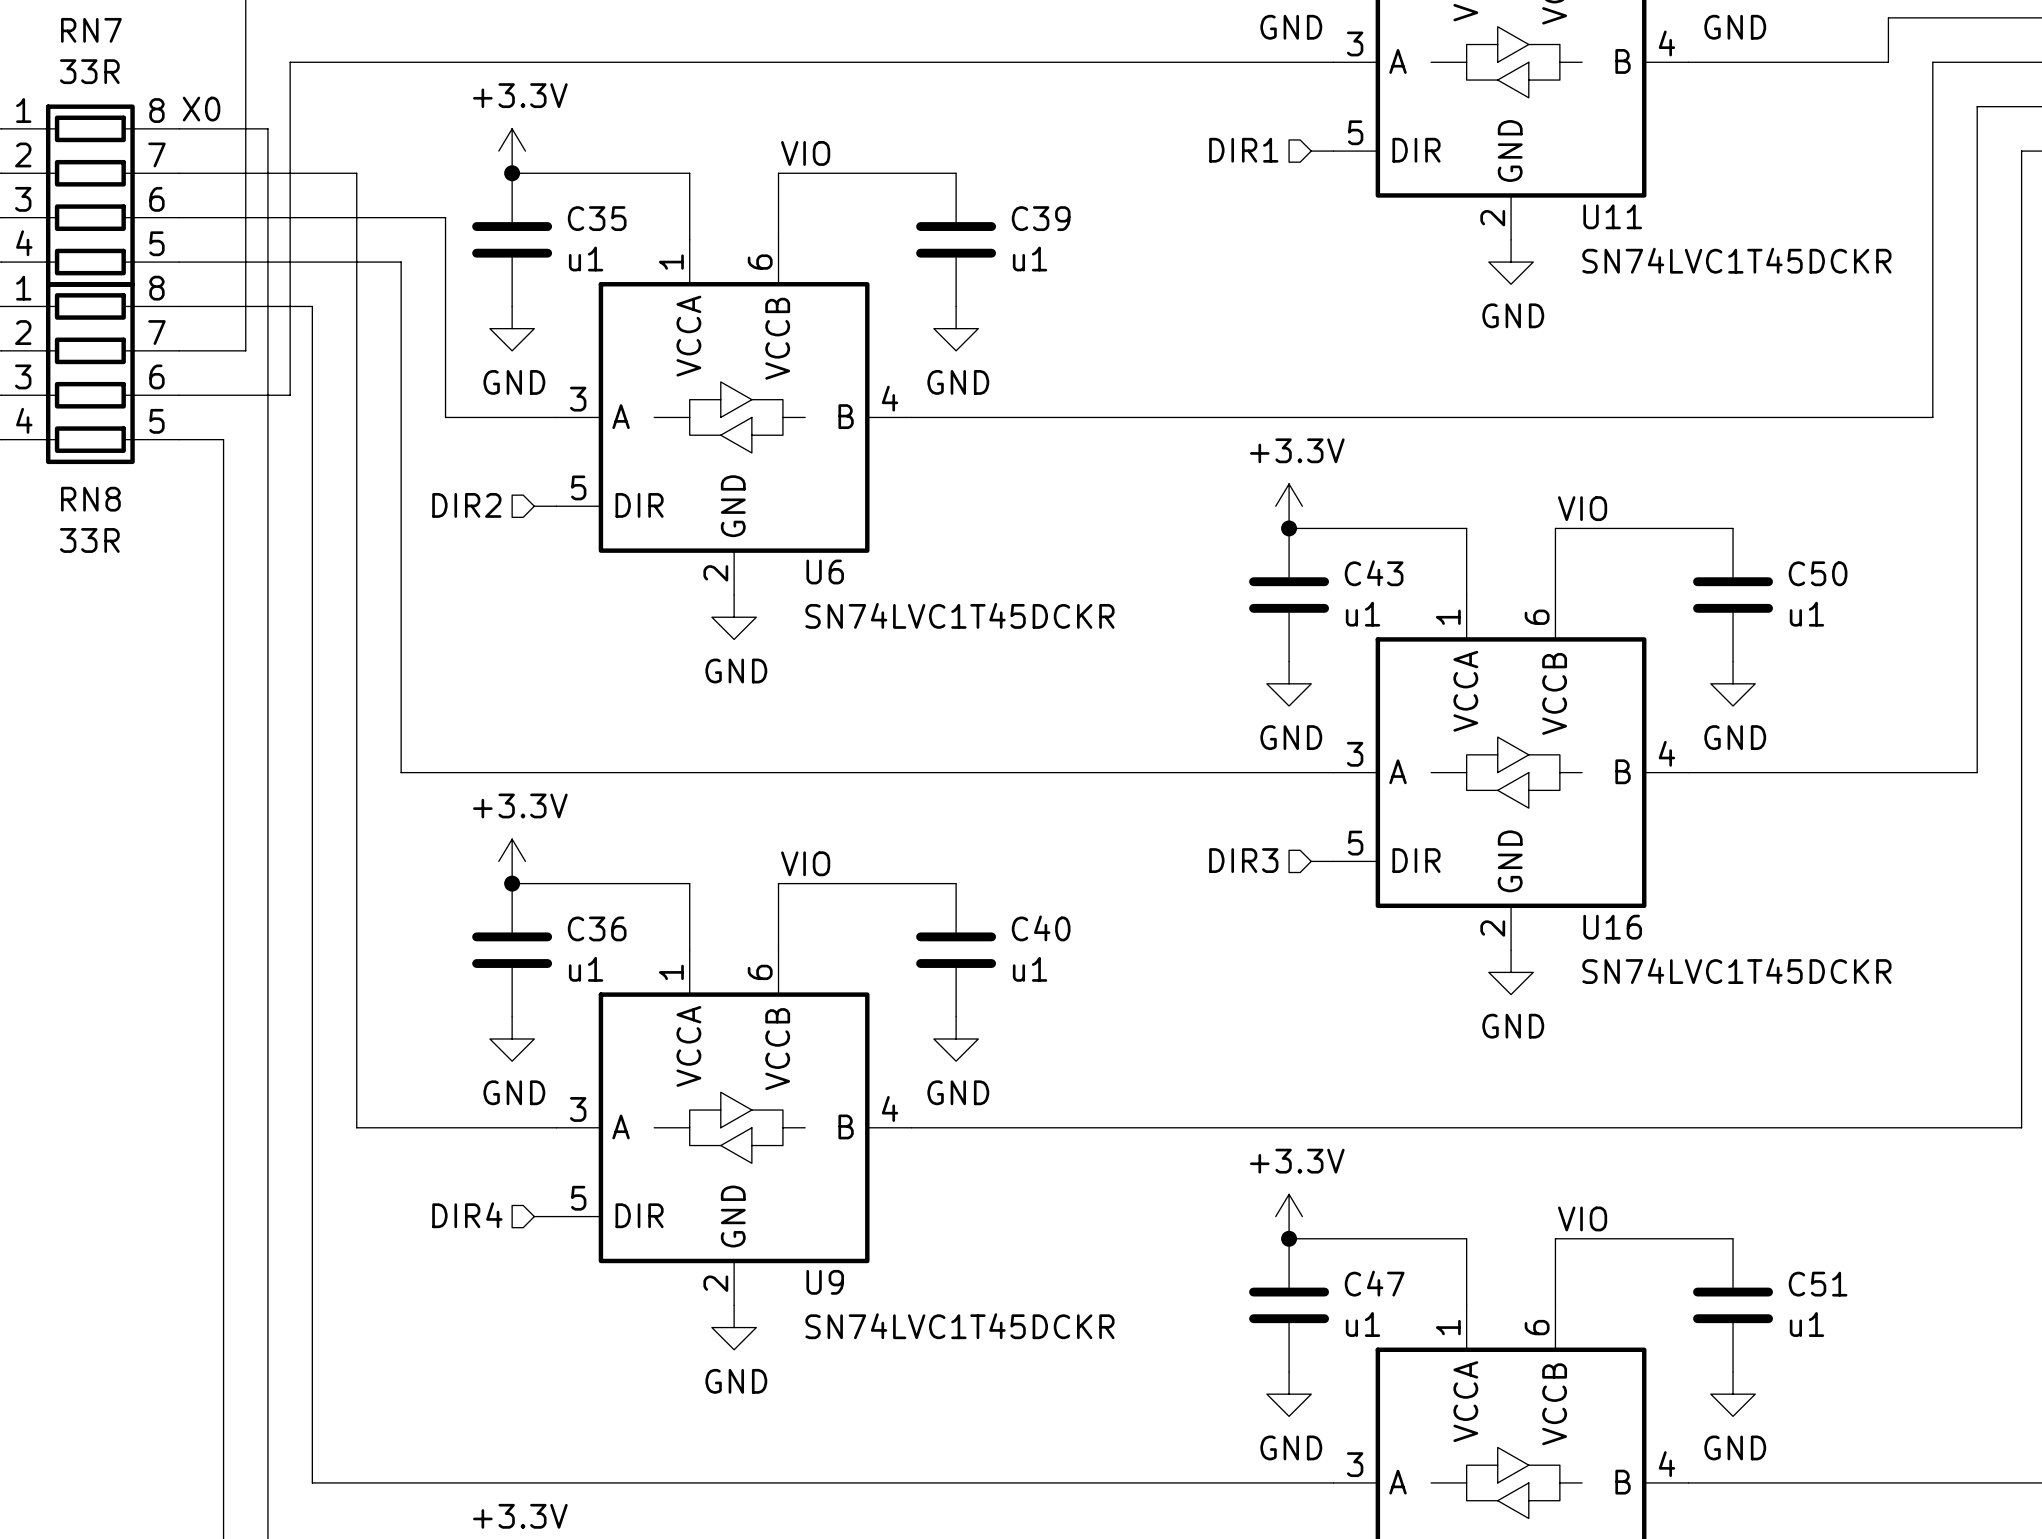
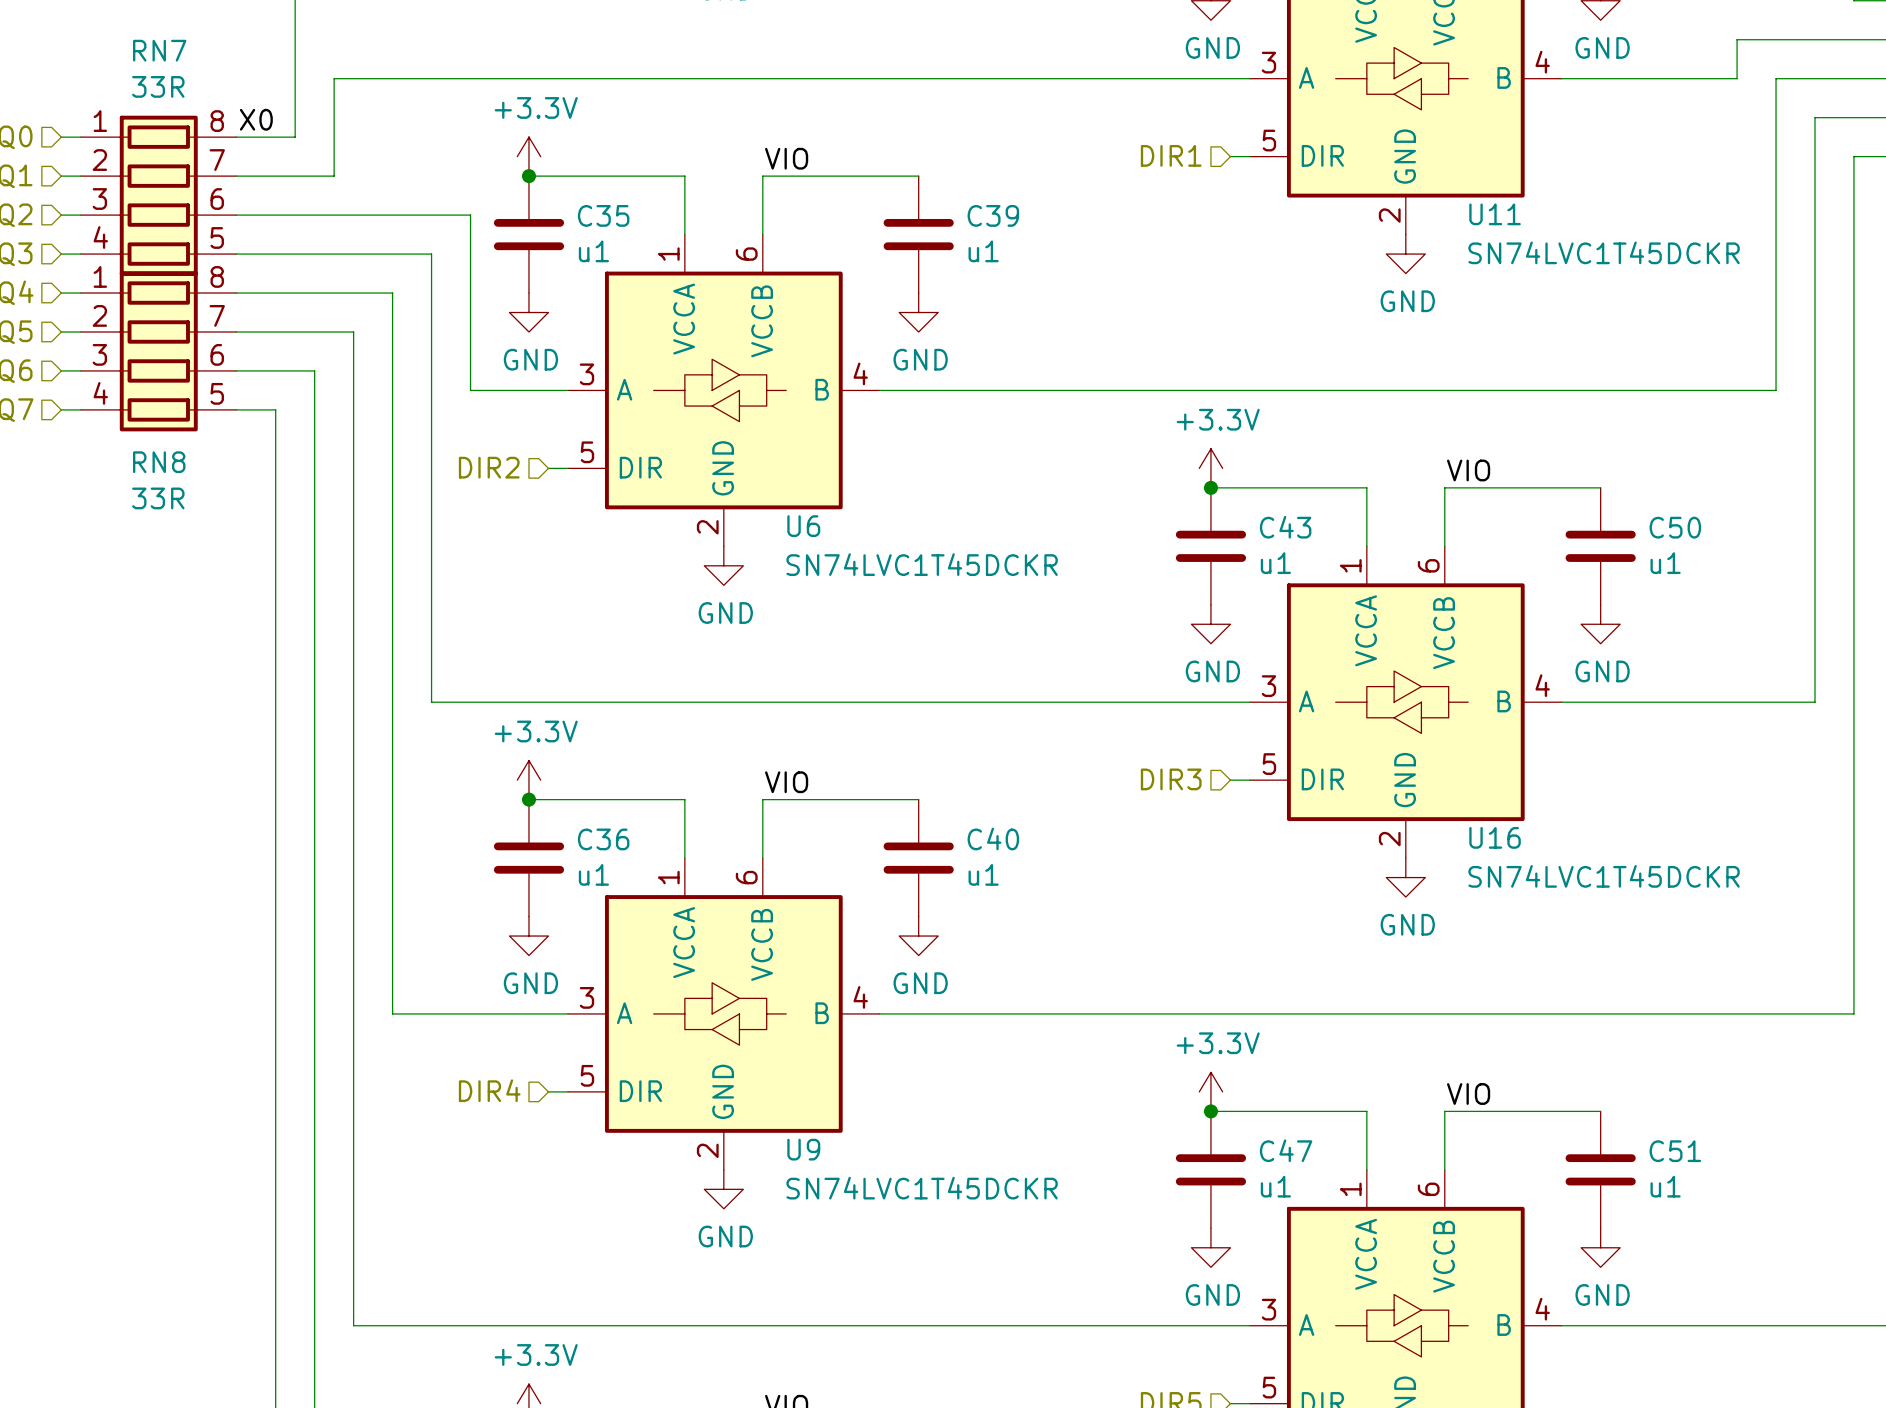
wire: (312, 306) (312, 350) -> (353, 293) (392, 293)
wire: (356, 306) (356, 173) (290, 173) (290, 395) (267, 395) (267, 128) (245, 128) (245, 350) -> (353, 331) (295, 331)

